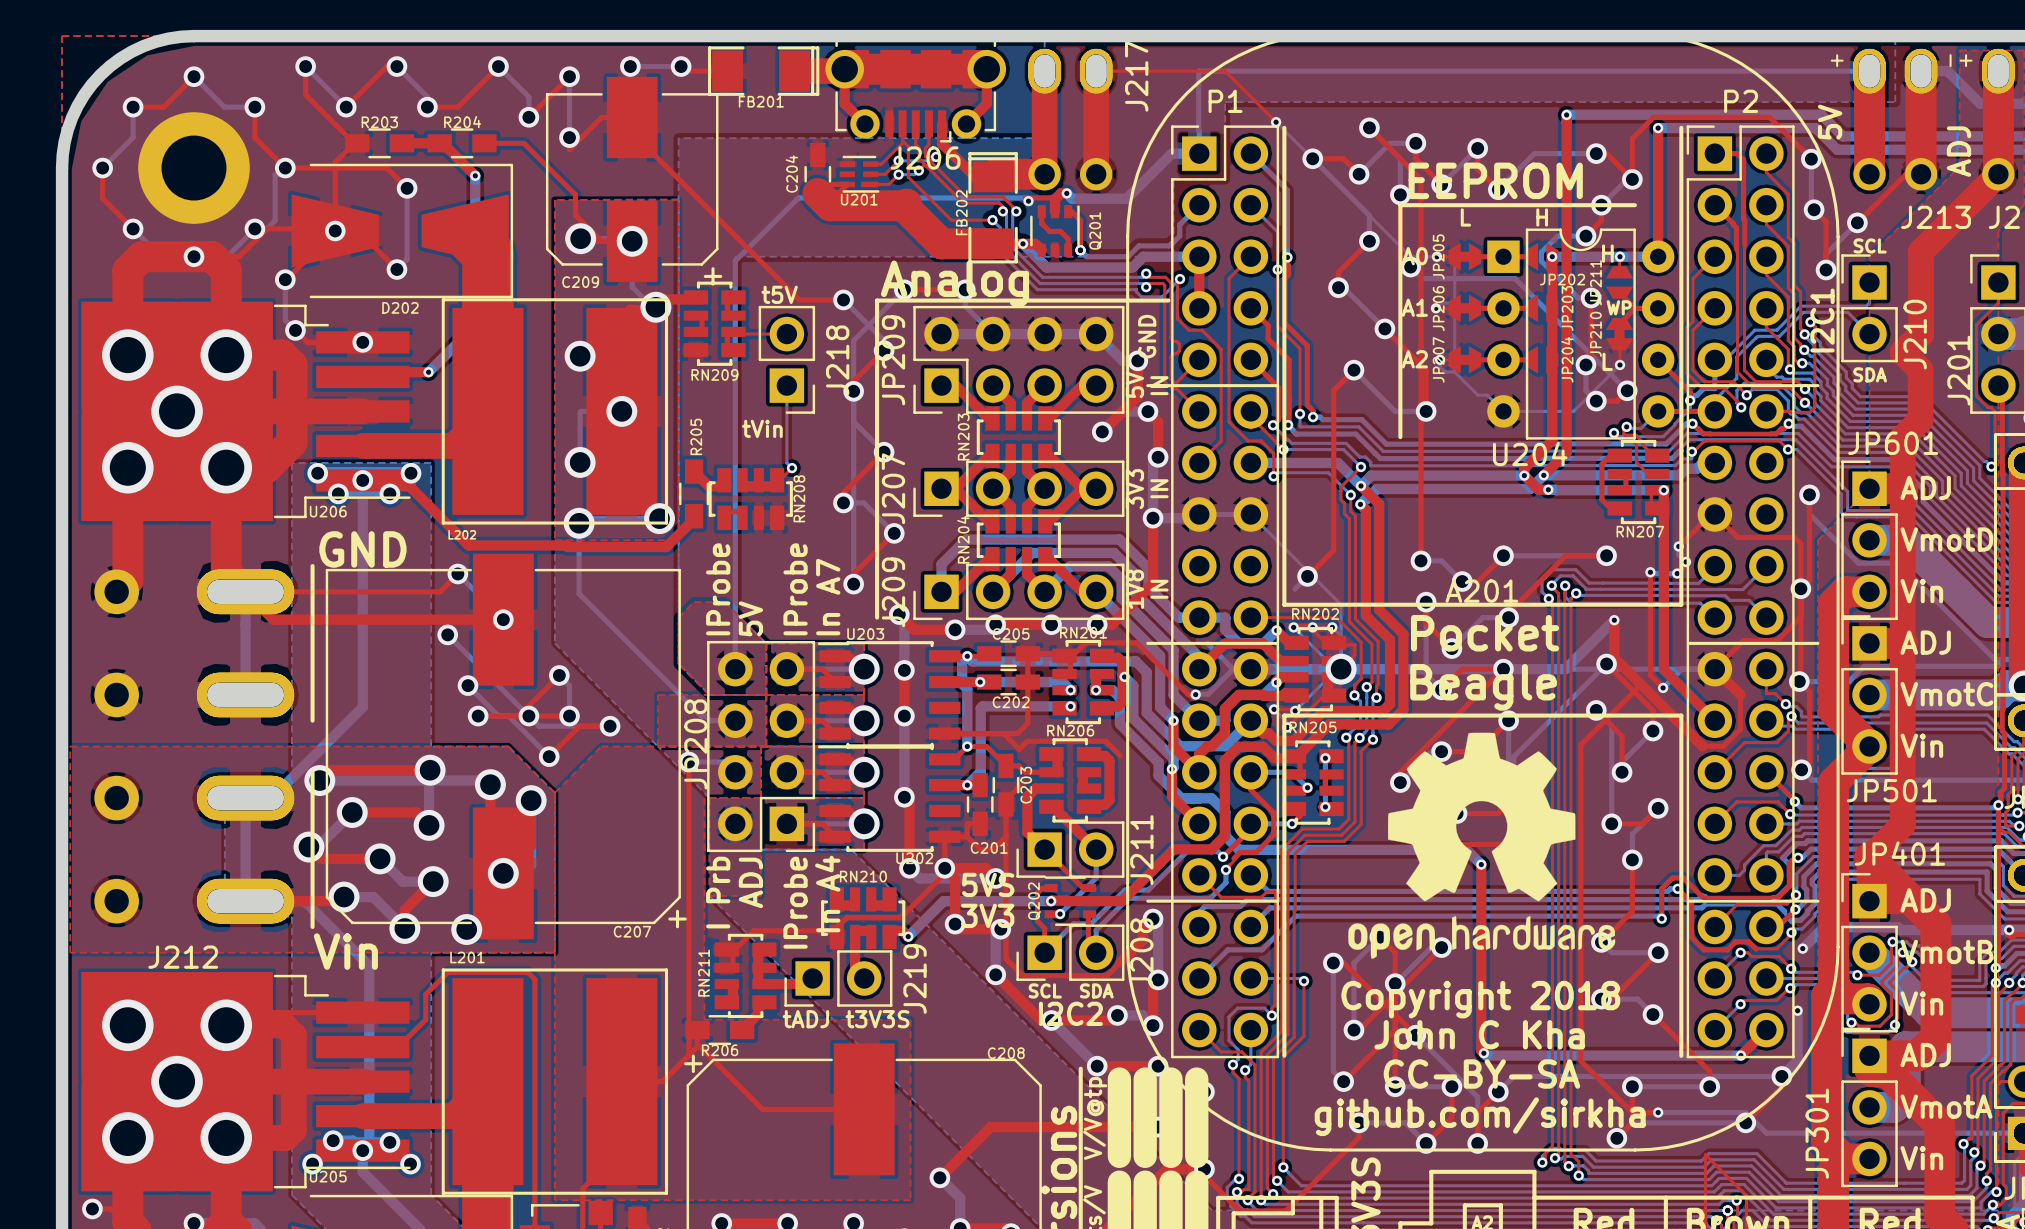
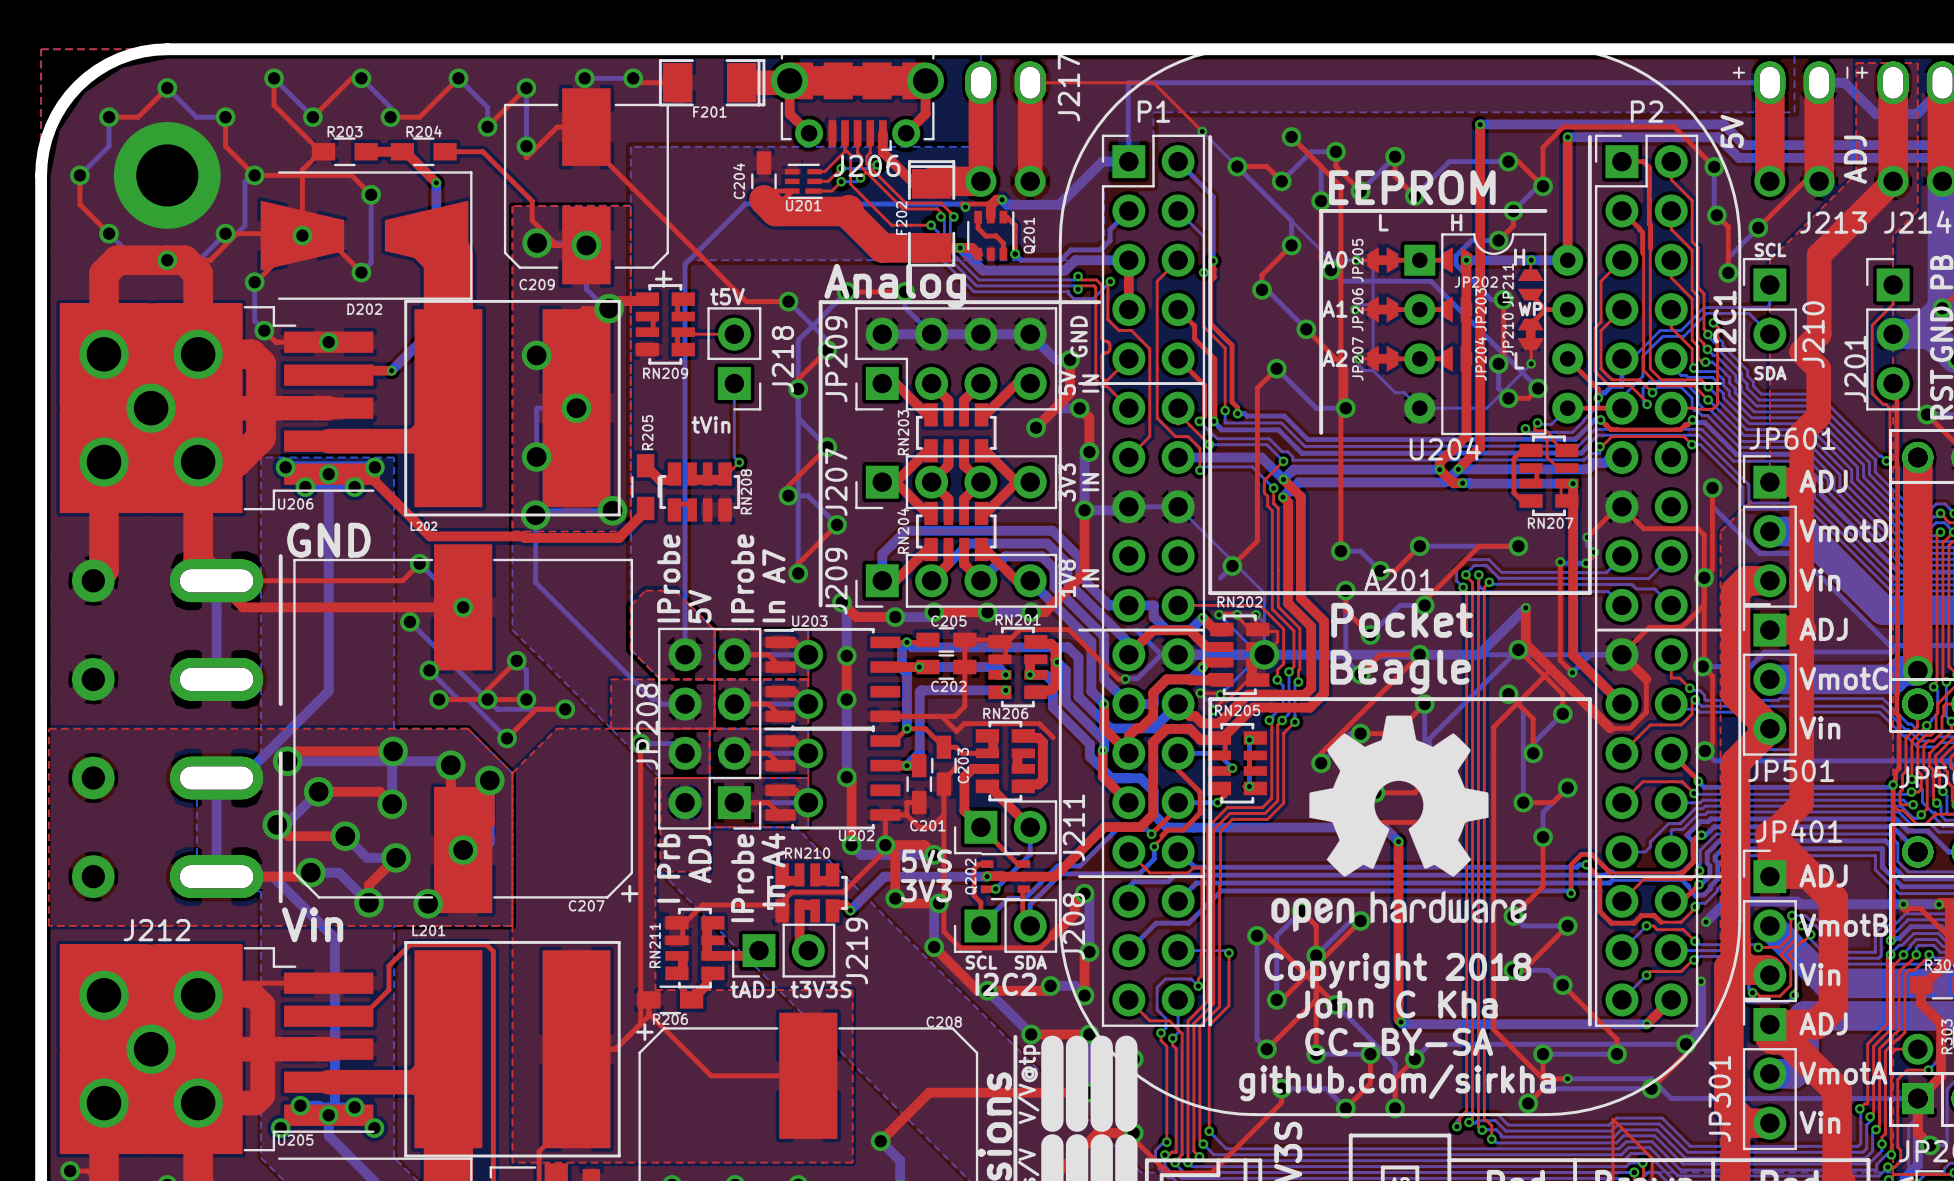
FB201 name: FB201 (761, 101) -> F201 (709, 111)
FB202 name: FB202 (961, 212) -> F202 (901, 218)

